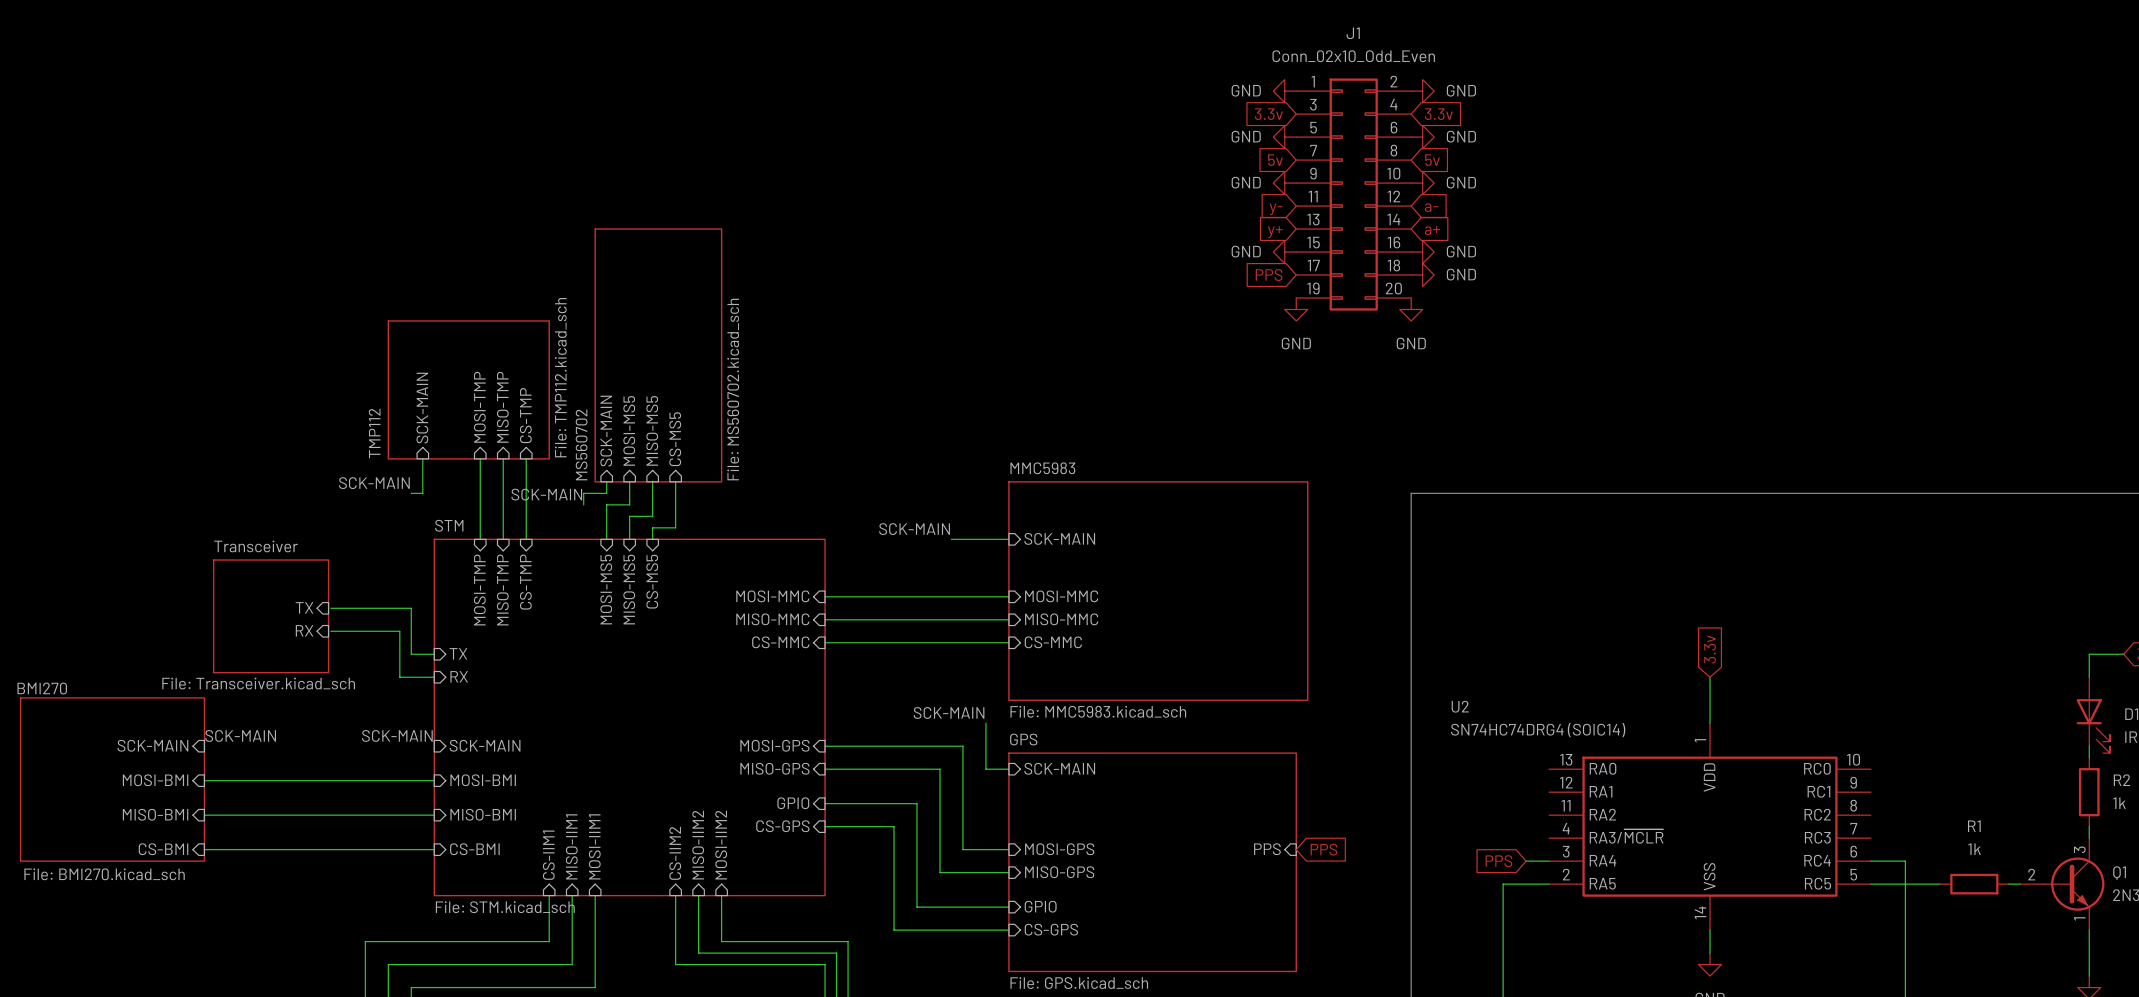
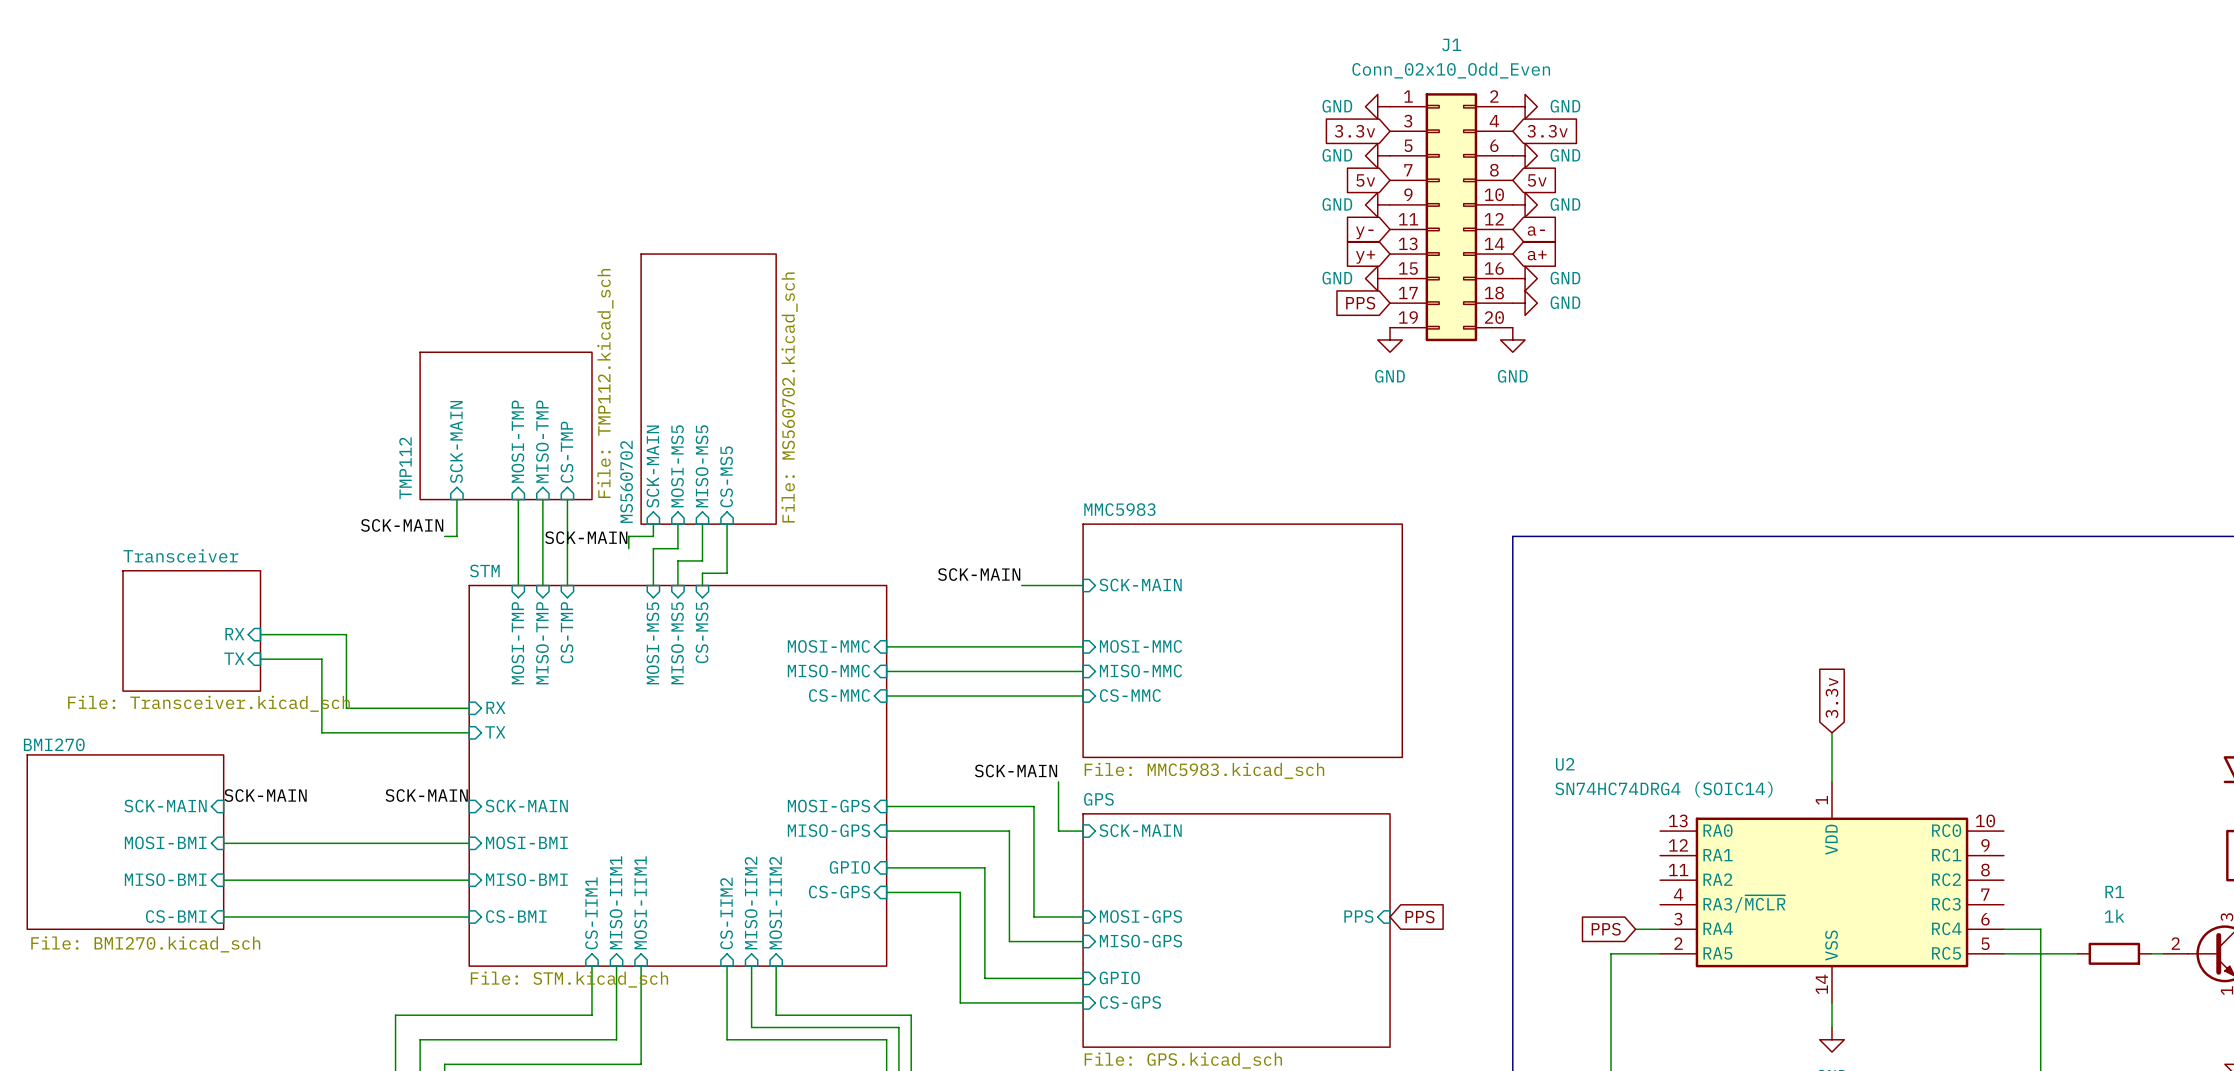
sheet Transceiver: none -> File: Transceiver.kicad_sch (191, 630)
sheet pin position: TX (304, 607) -> TX (234, 658)
wire: (330, 608) (411, 608) (411, 654) -> (260, 634) (346, 634) (346, 708) (444, 708)
sheet Transceiver: File: Transceiver.kicad_sch (271, 616) -> none
sheet pin position: RX (304, 630) -> RX (234, 634)
wire: (330, 631) (399, 631) (399, 677) -> (260, 659) (321, 659) (321, 732) (432, 732)
sheet pin: TX (458, 653) -> RX (495, 707)
sheet pin: RX (459, 676) -> TX (495, 732)

